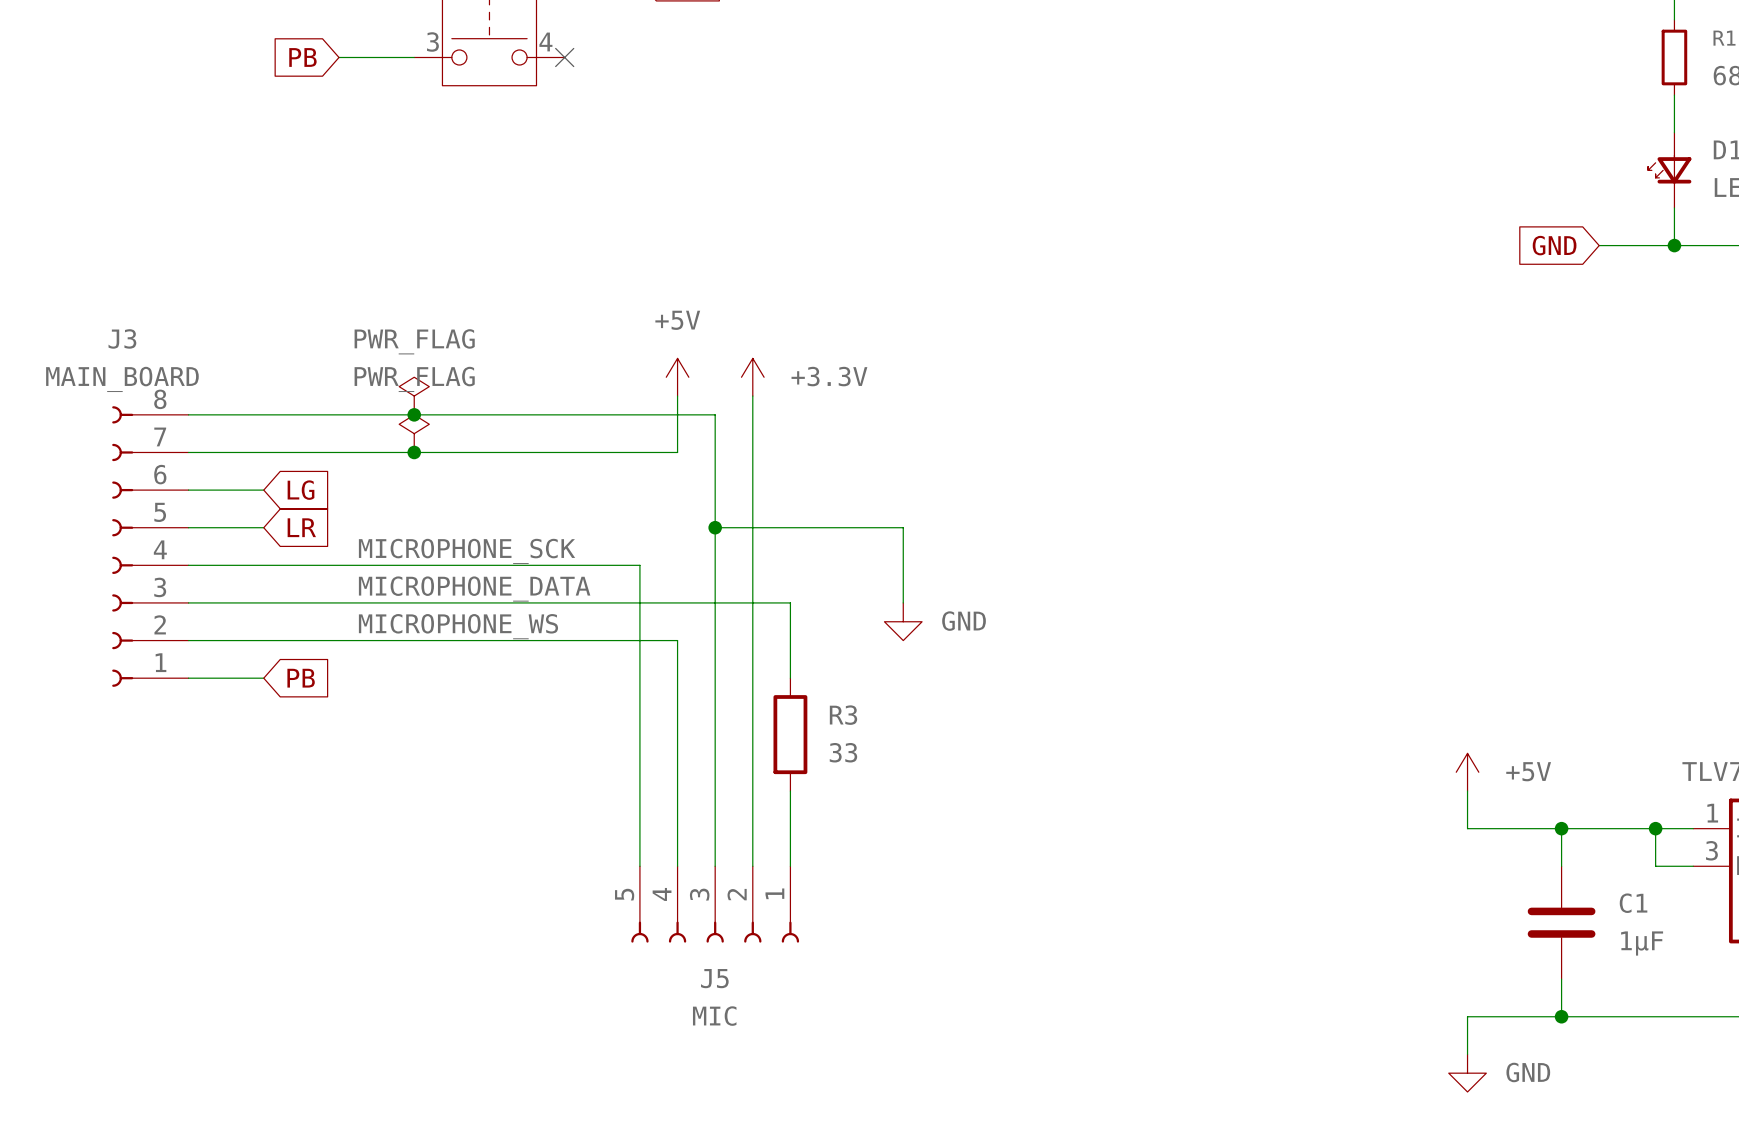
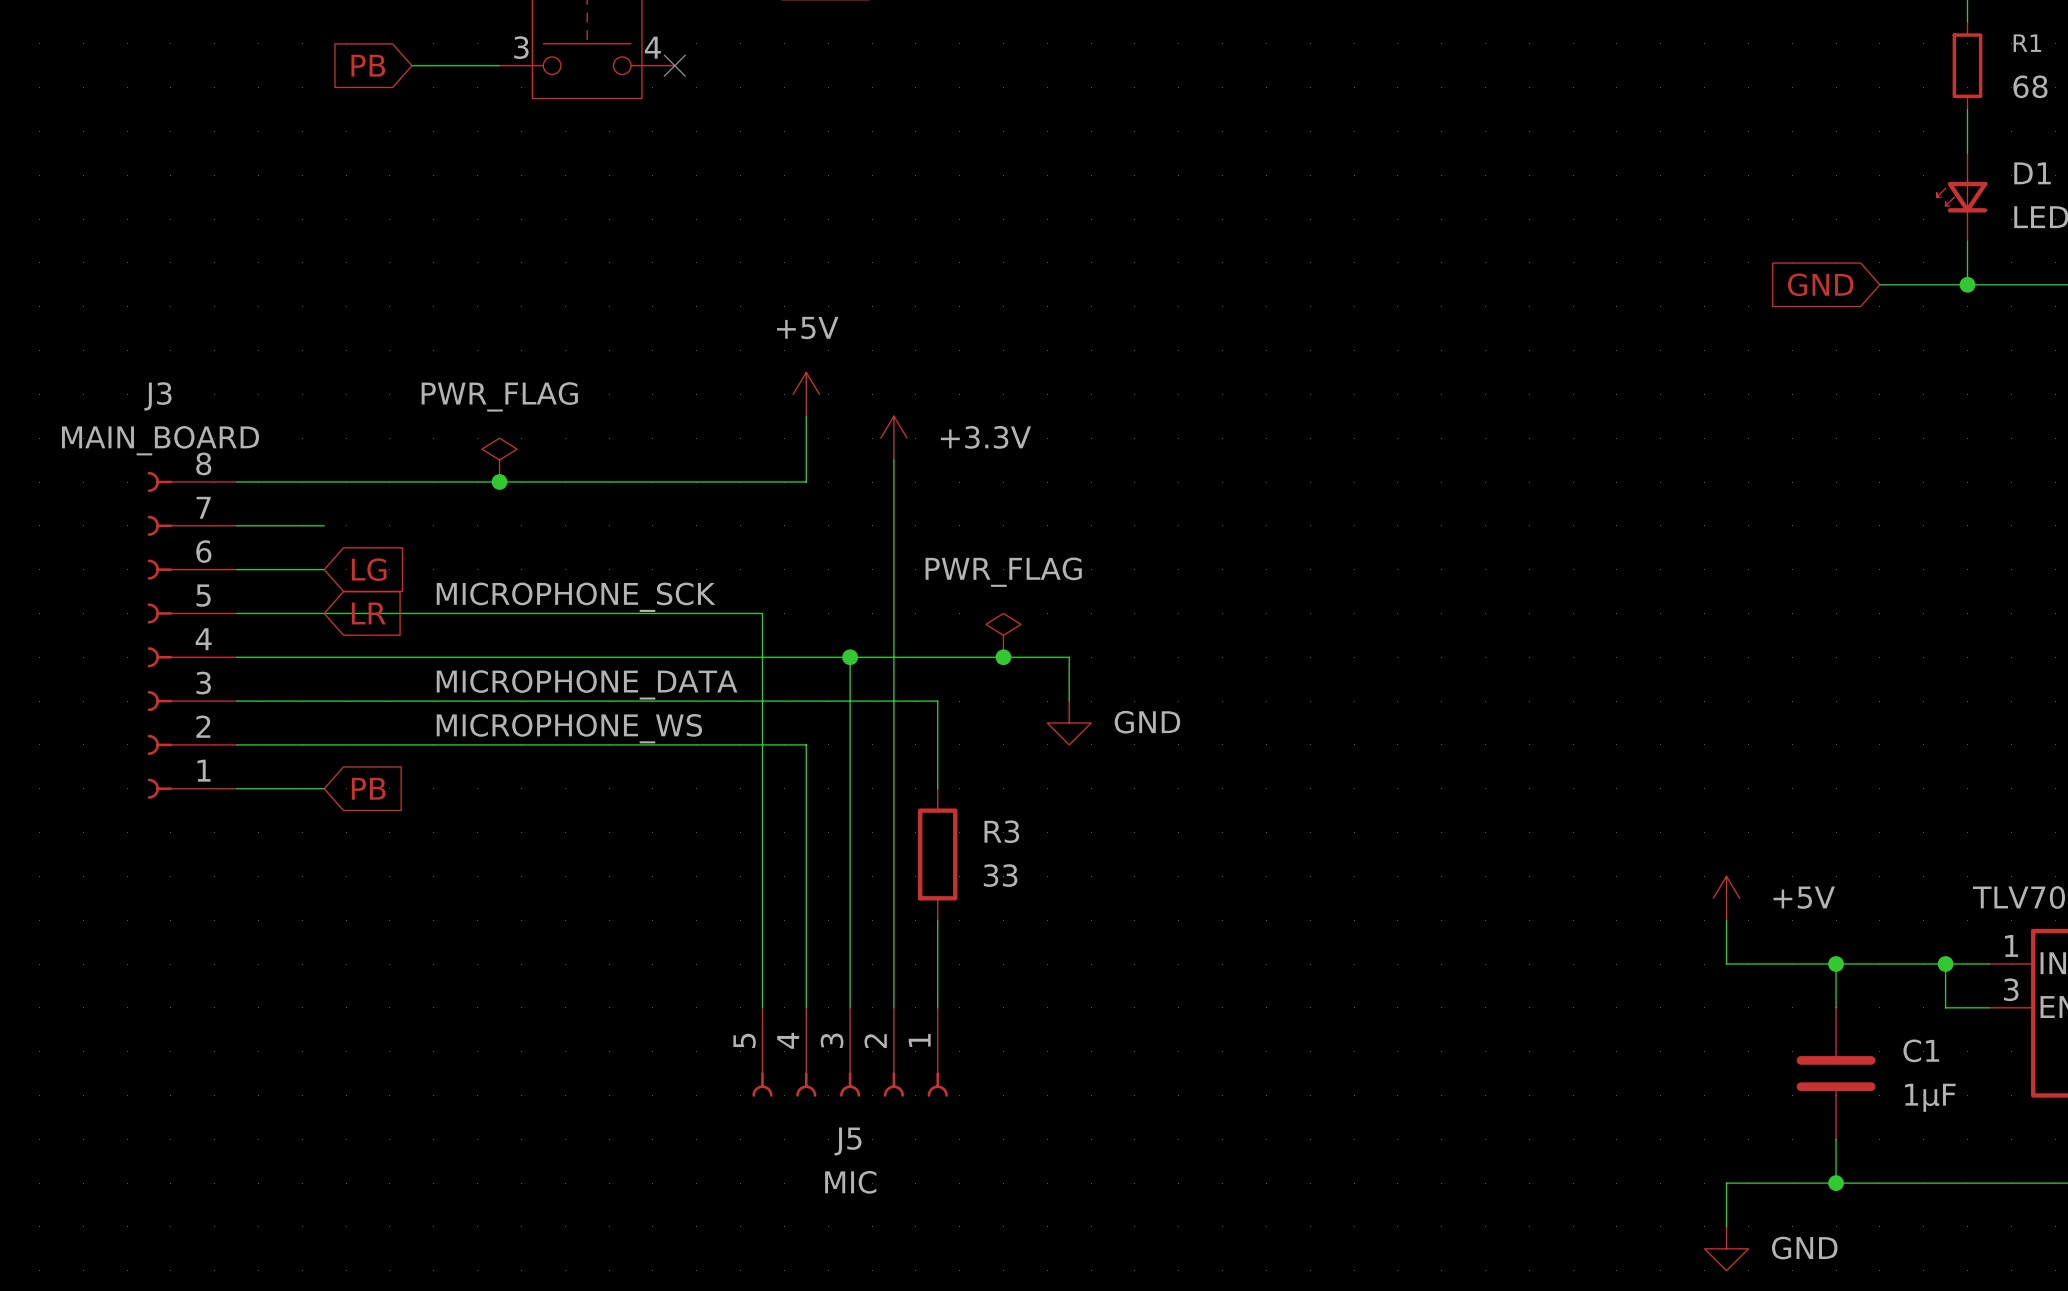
power symbol position: +5V (677, 377) -> +5V (806, 394)
power symbol: PWR_FLAG (414, 433) -> none
wire: (263, 452) (677, 452) (677, 414) (715, 414) (715, 565) -> none
junction: (414, 452) -> none
wire: (715, 527) (903, 527) (903, 565) -> (324, 613) (762, 613) (762, 657) (1069, 657)
junction position: (715, 527) -> (850, 657)
power symbol: none -> PWR_FLAG (1003, 635)
label position: MICROPHONE_SCK (467, 551) -> MICROPHONE_SCK (576, 597)
junction: none -> (1003, 657)

